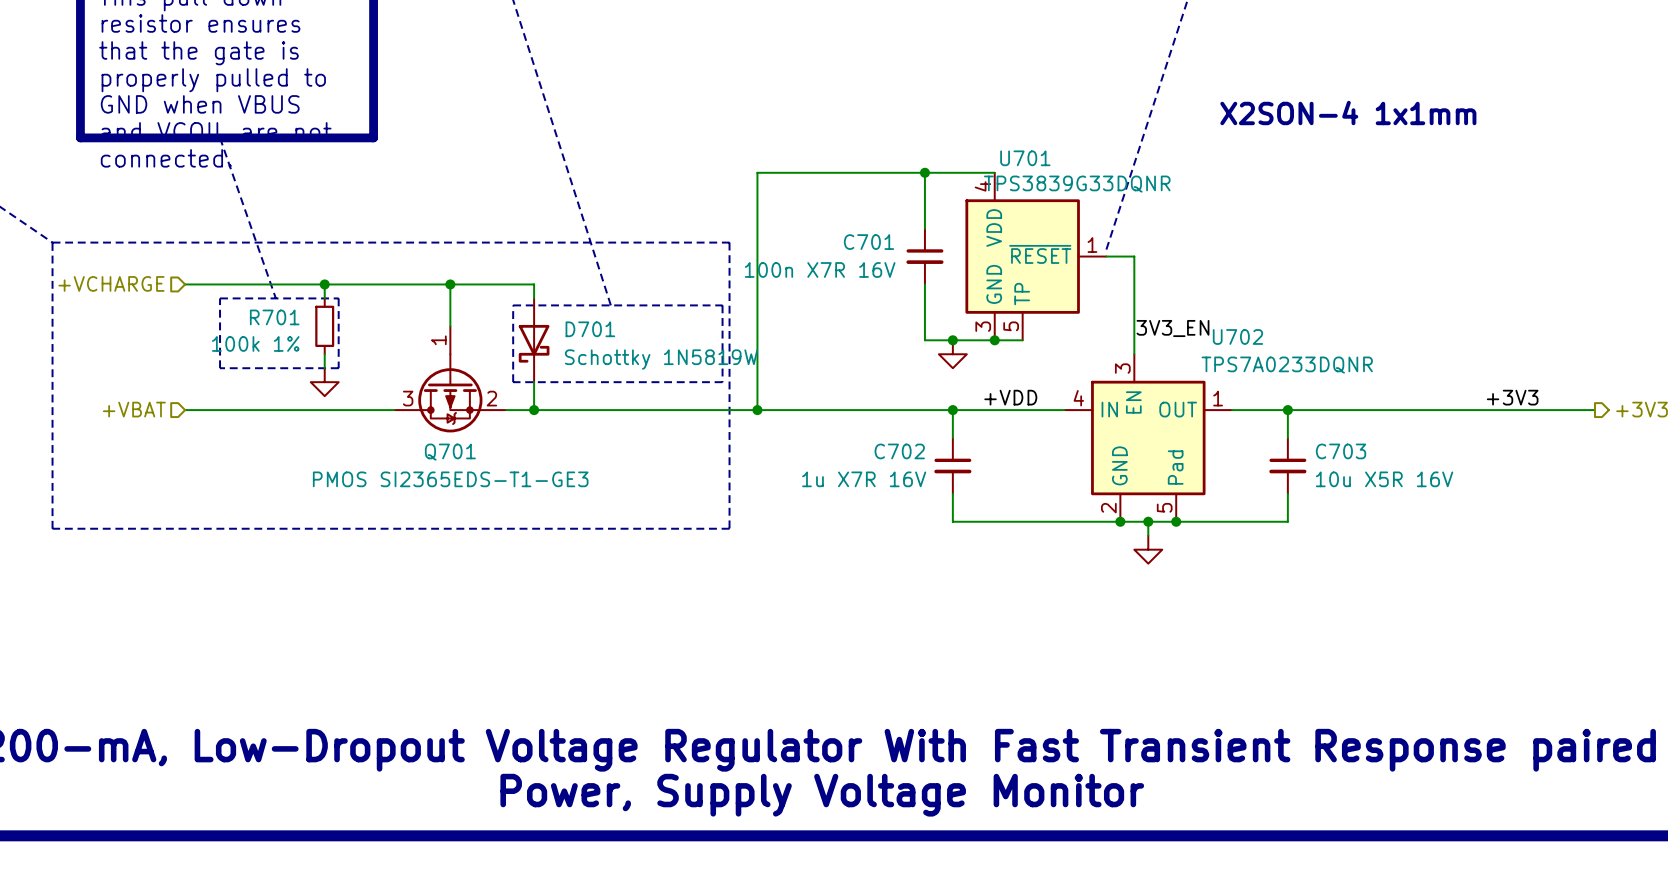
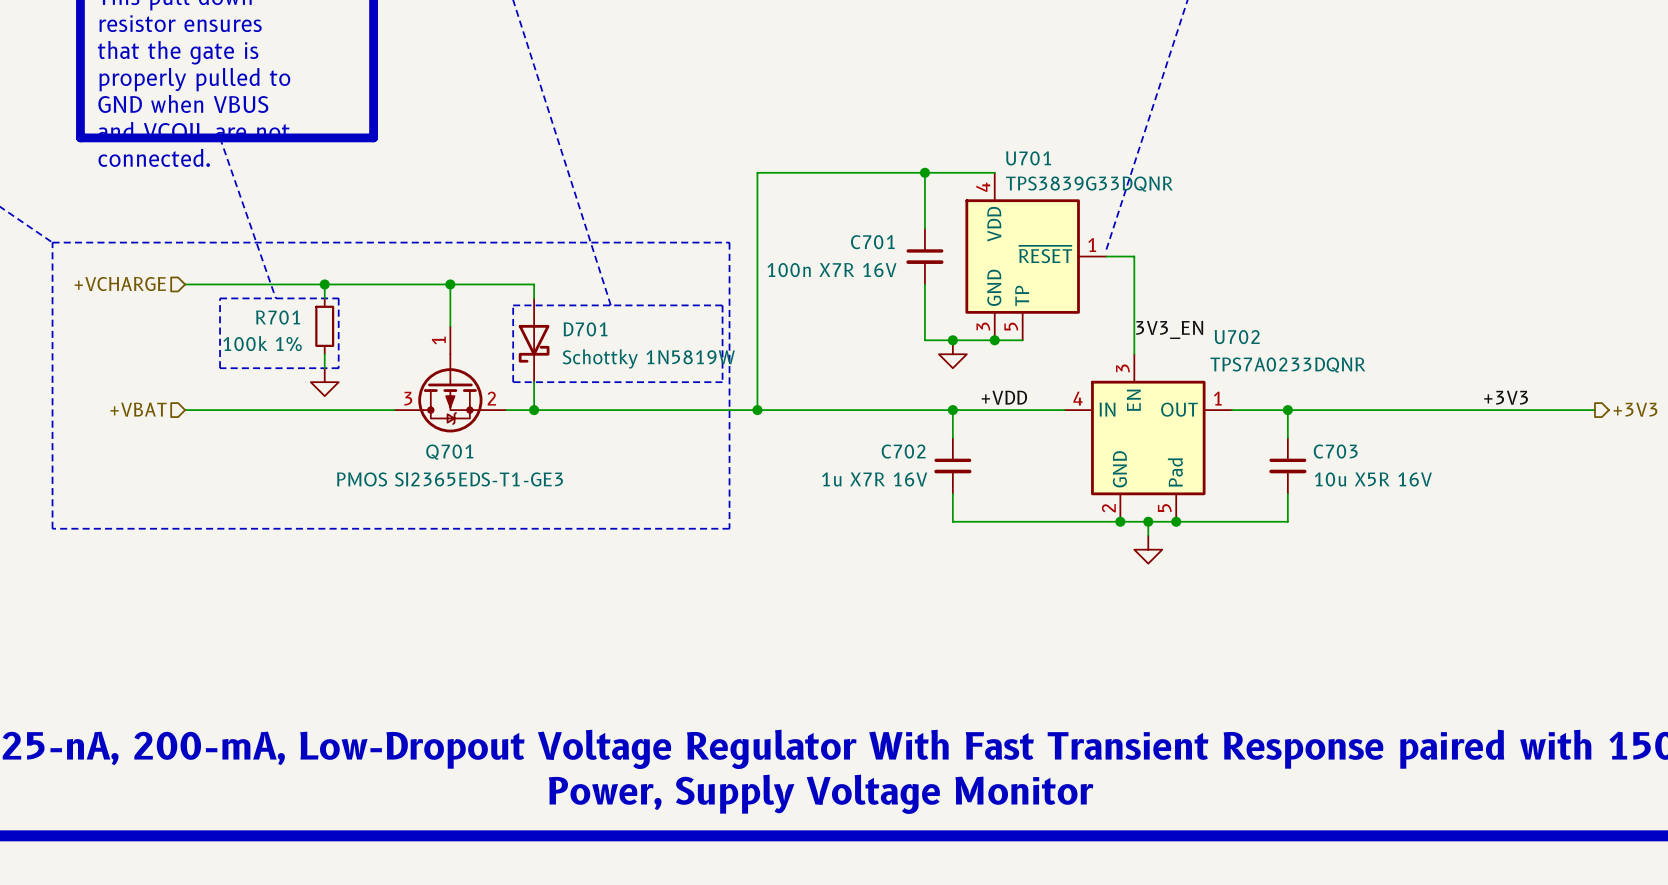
text: X2SON-4 1x1mm (1348, 113) -> none

